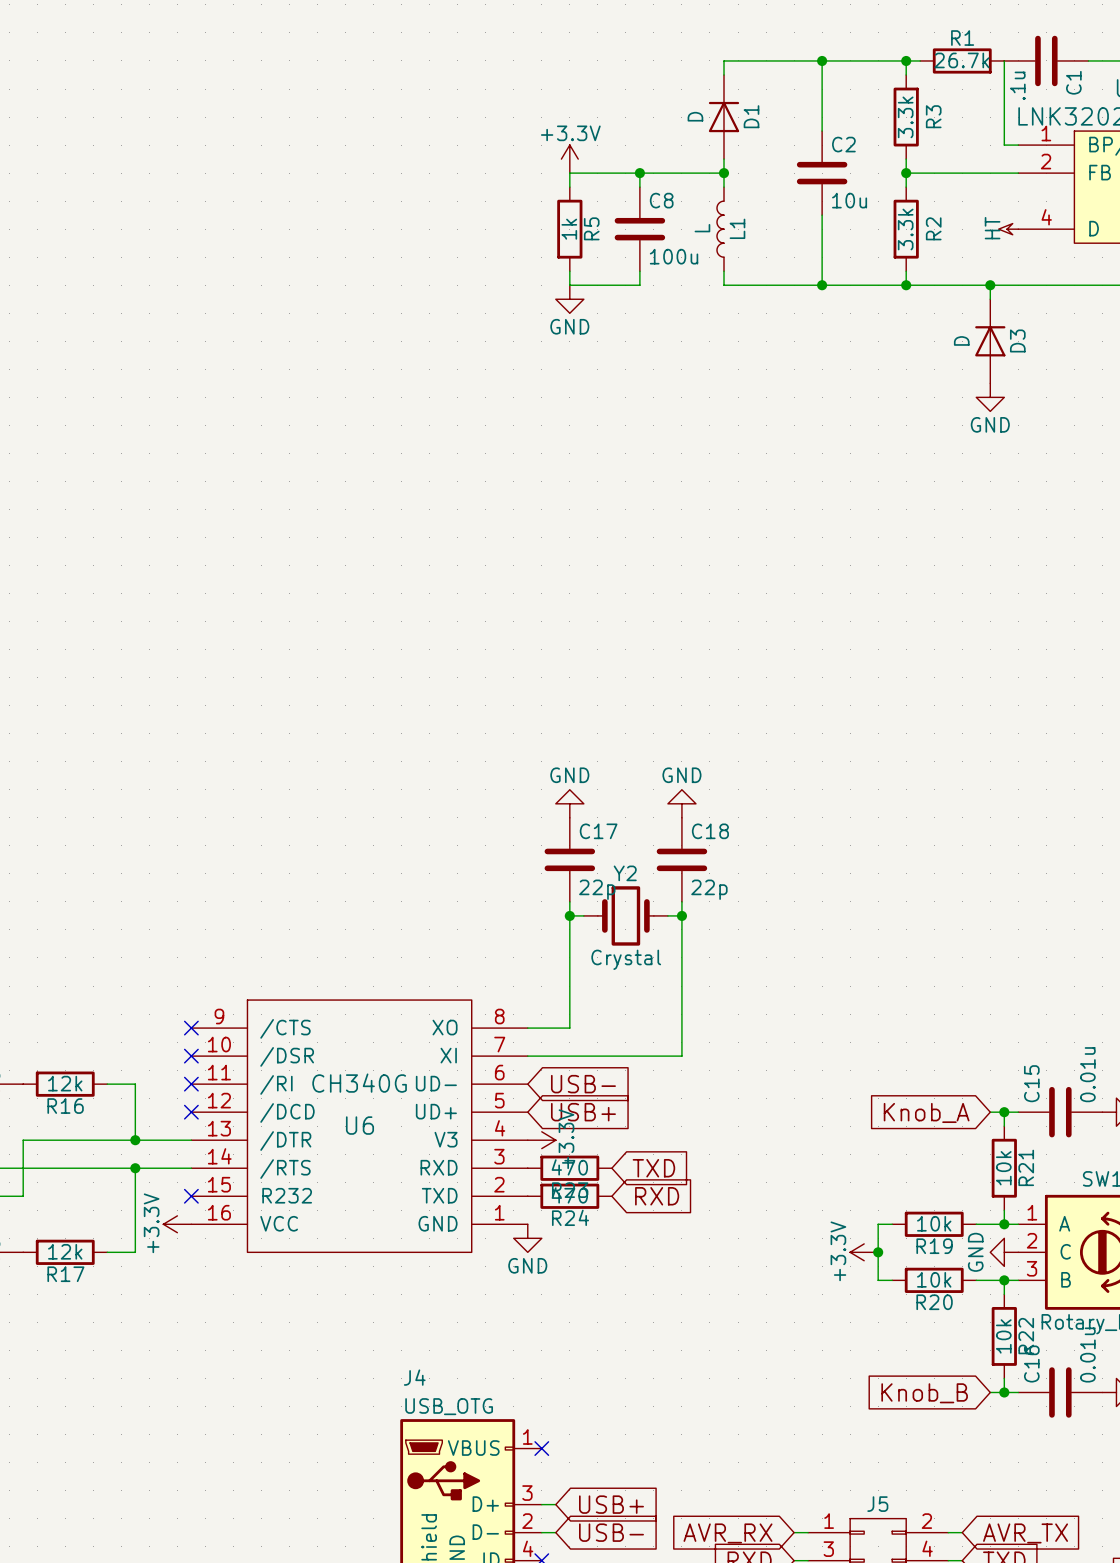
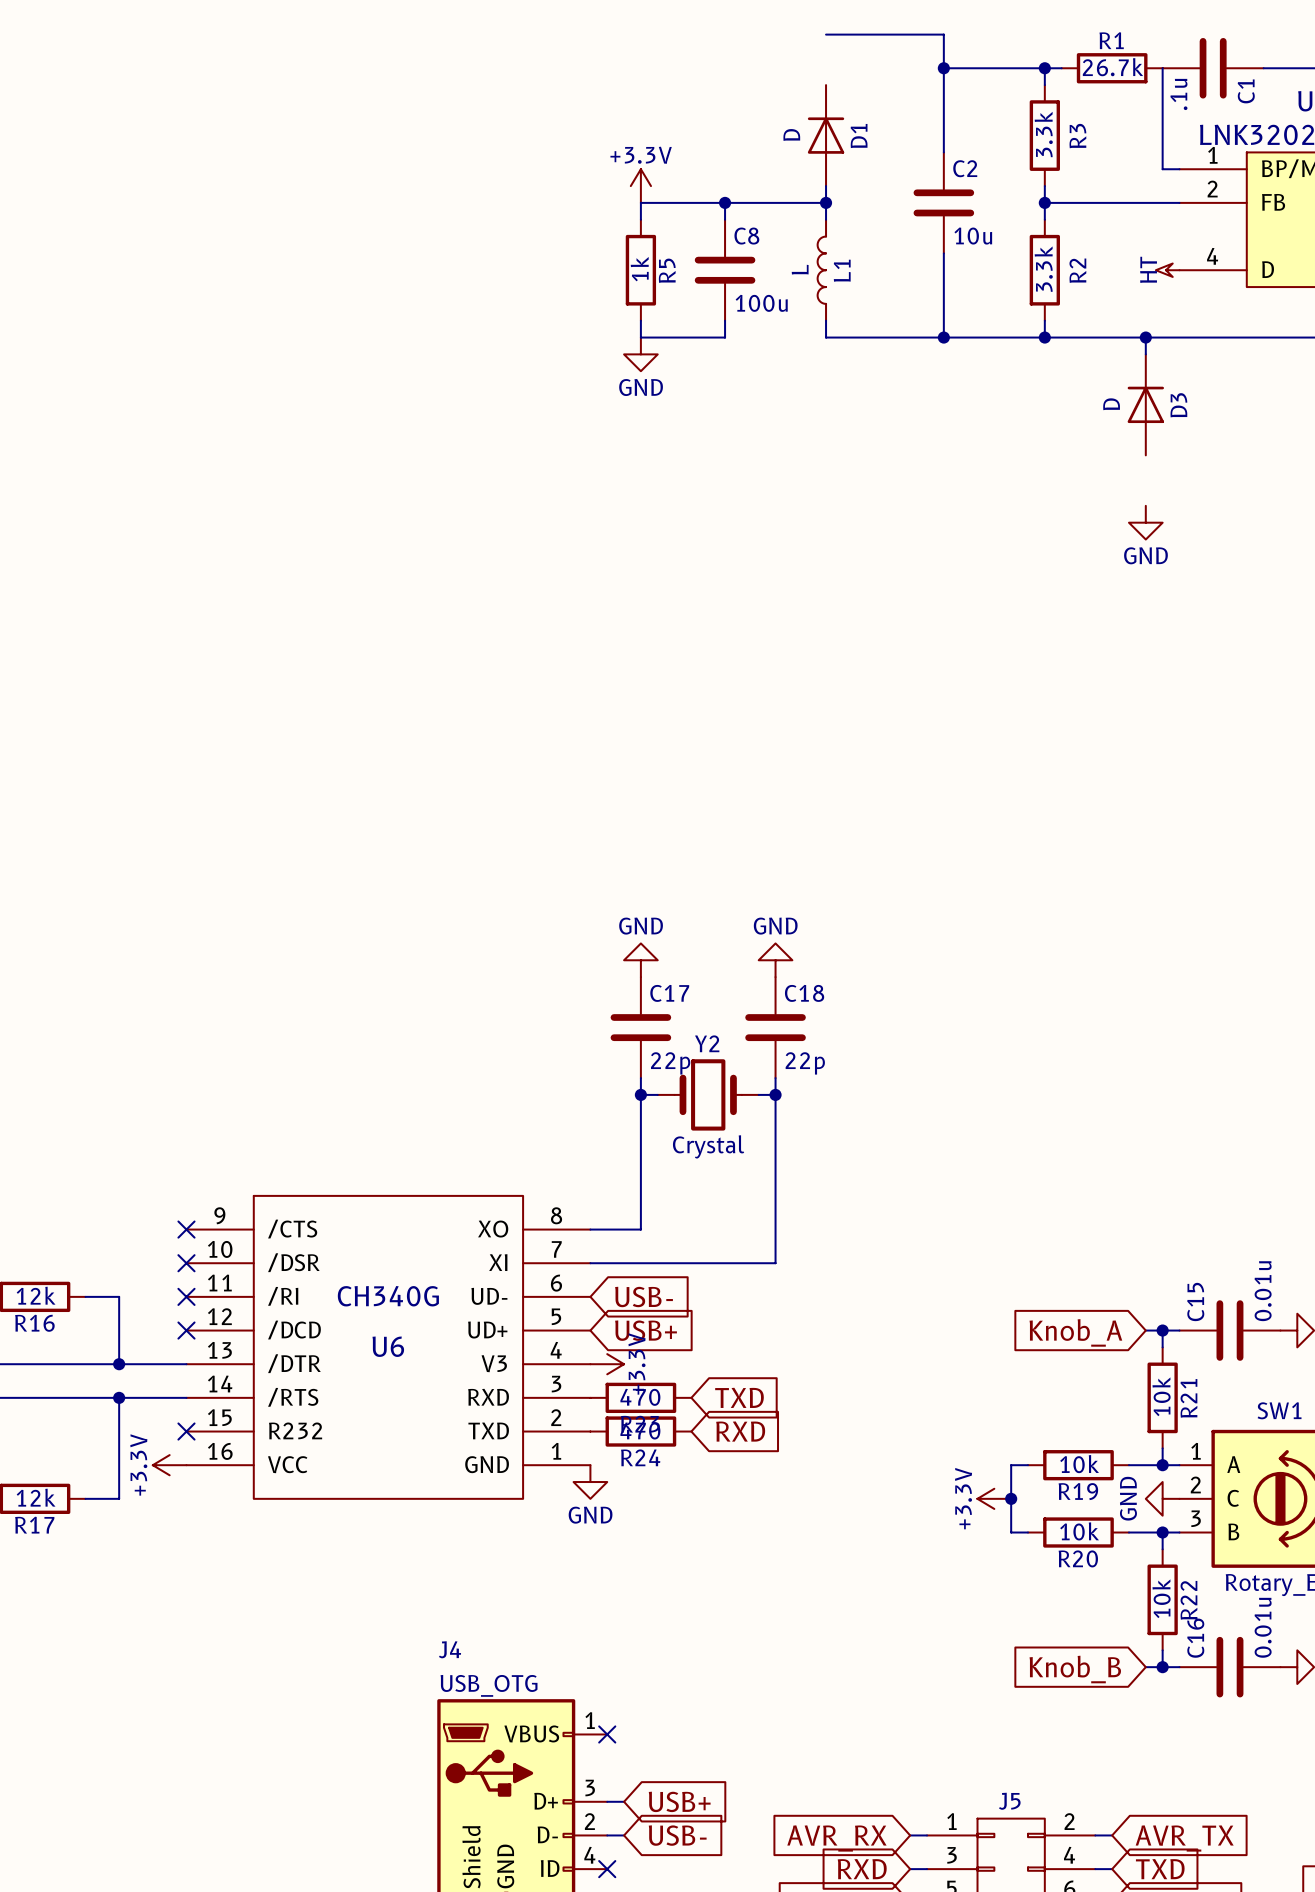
wire: (822, 60) (724, 60) (724, 75) -> (943, 68) (943, 34) (826, 34)
power symbol position: GND (990, 397) -> GND (1145, 522)

